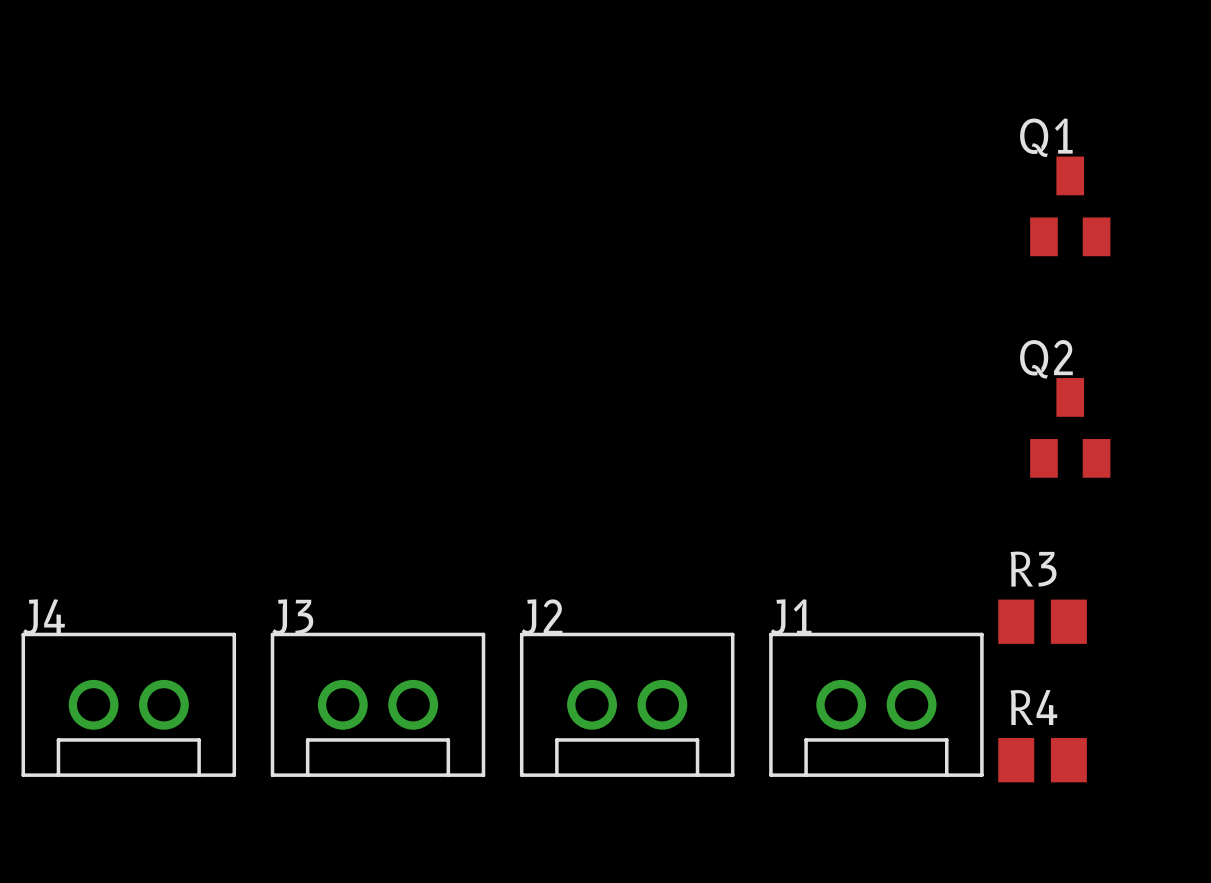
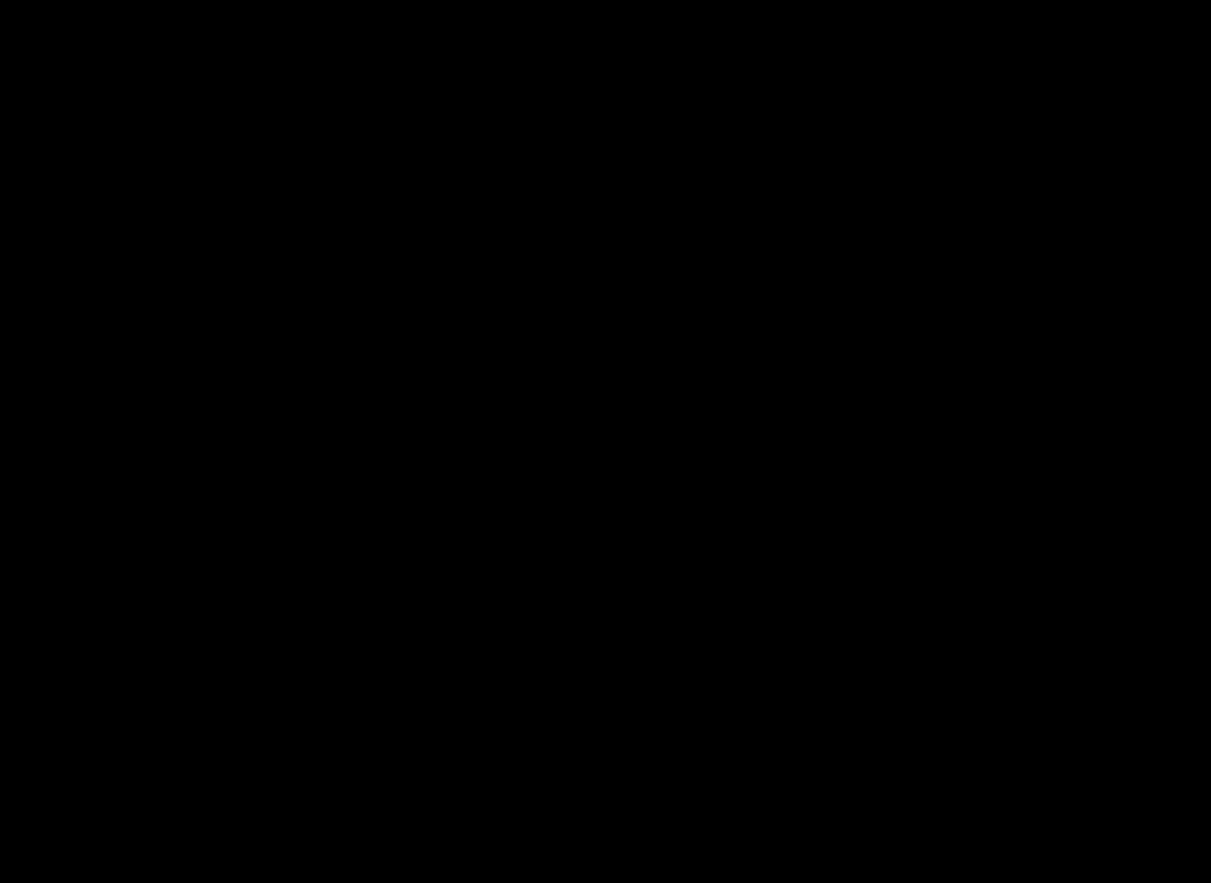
Q1: (1070, 206) -> none
Q2: (1070, 427) -> none
R3: (1042, 621) -> none
J4: (128, 704) -> none
J3: (377, 704) -> none
J2: (627, 704) -> none
J1: (876, 704) -> none
R4: (1042, 760) -> none

